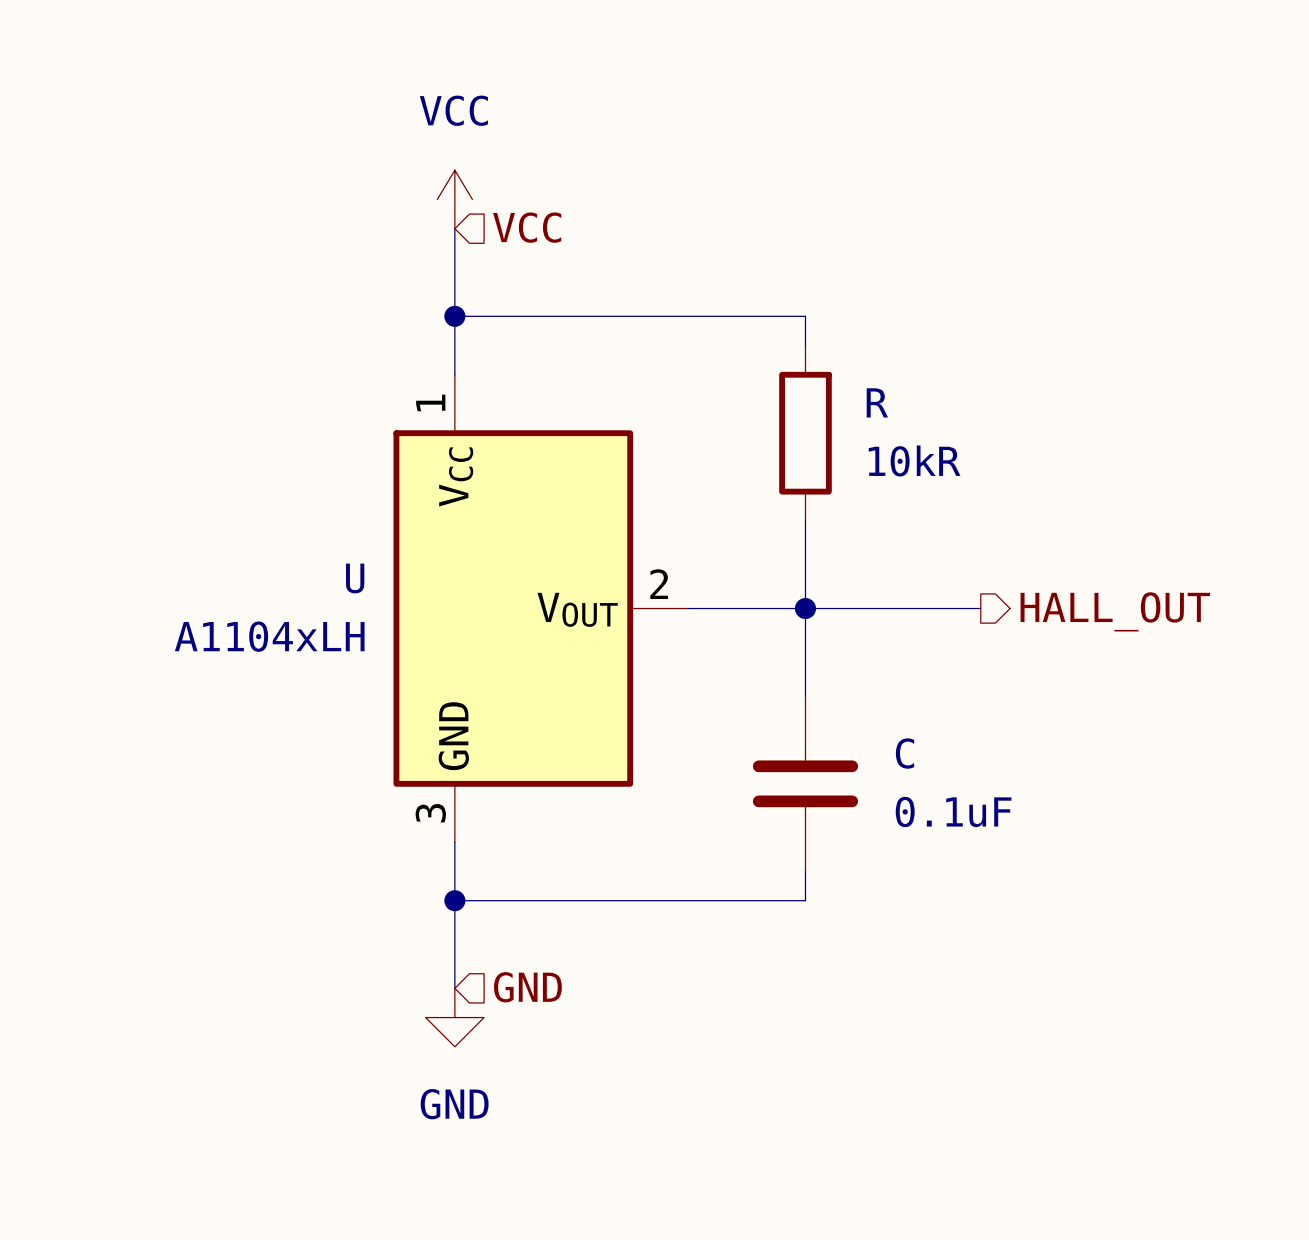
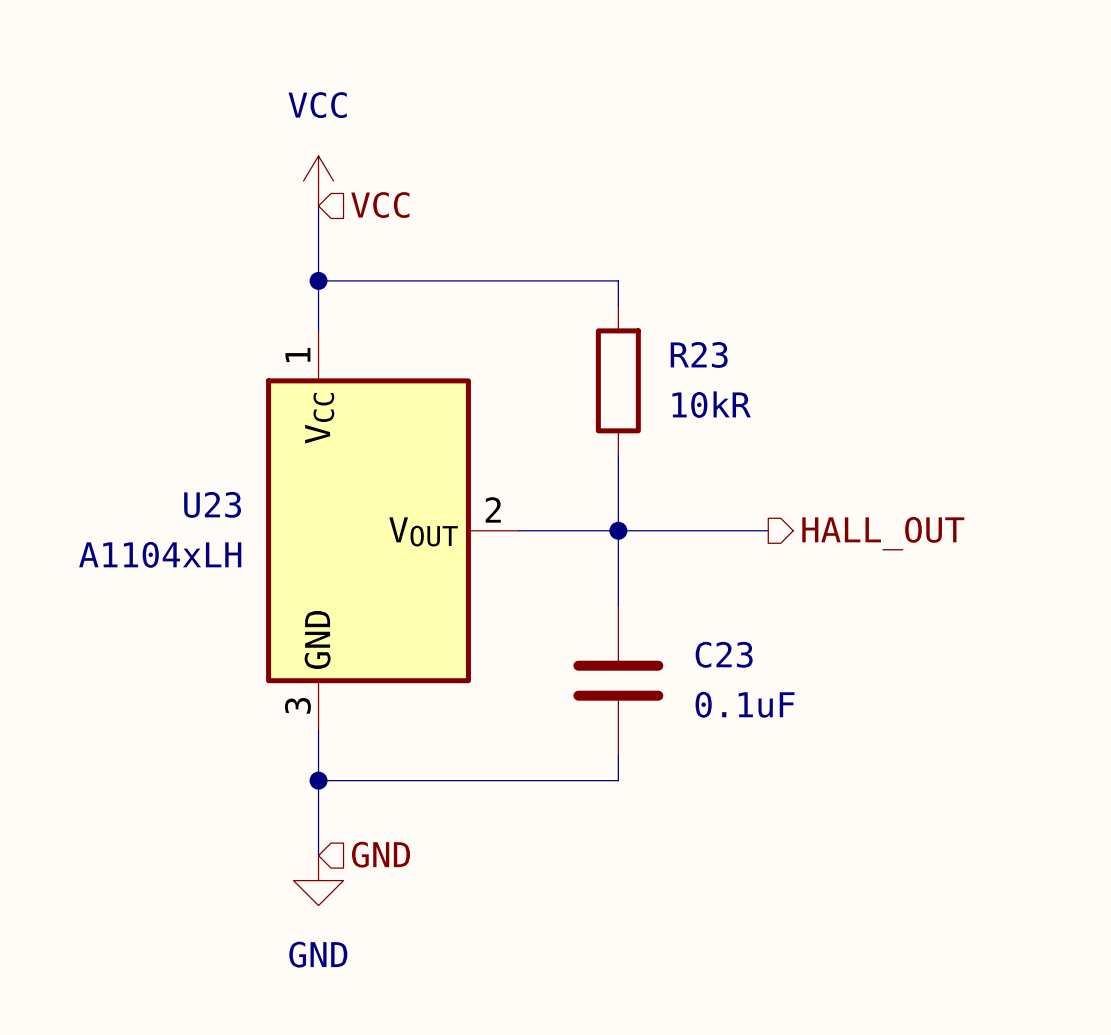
R name: R (877, 402) -> R23 (699, 354)
U name: U (355, 578) -> U23 (212, 504)
C name: C (904, 753) -> C23 (724, 654)

